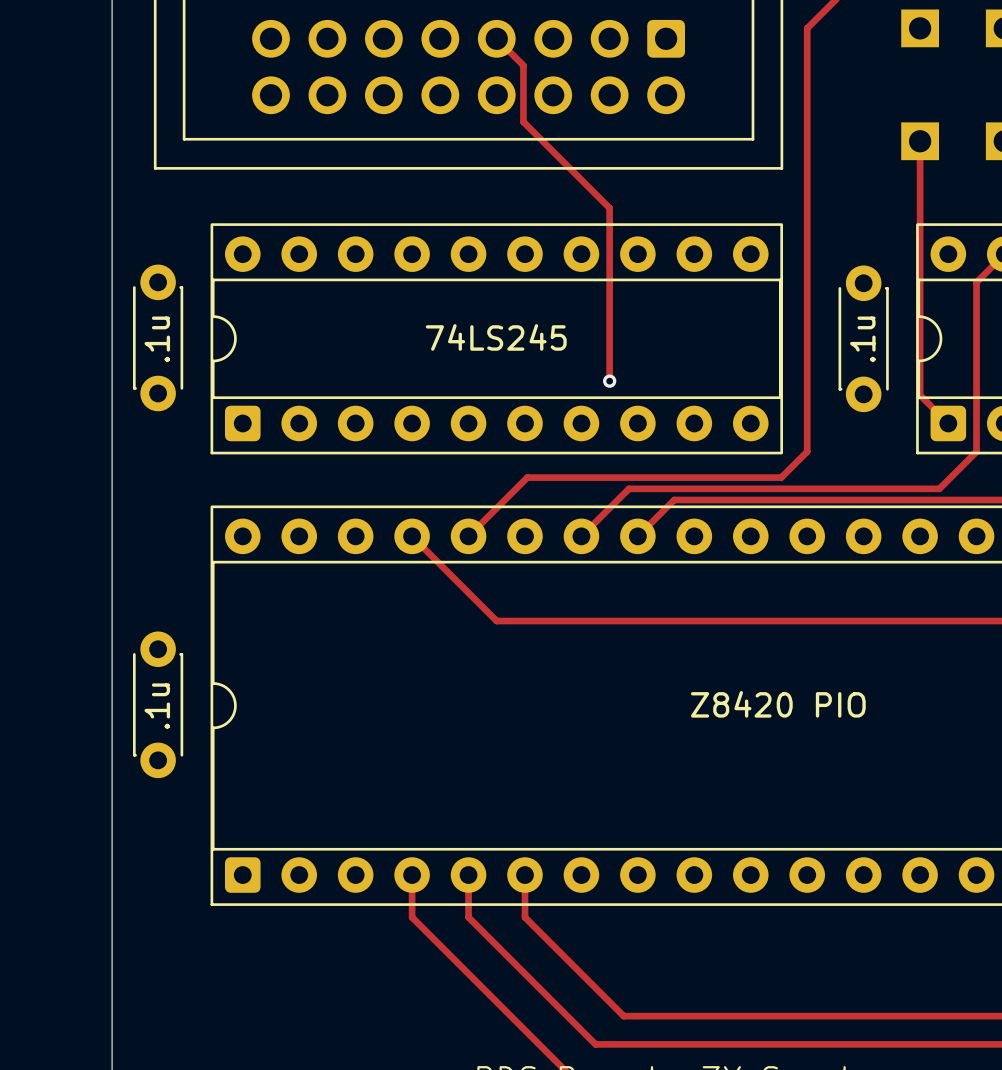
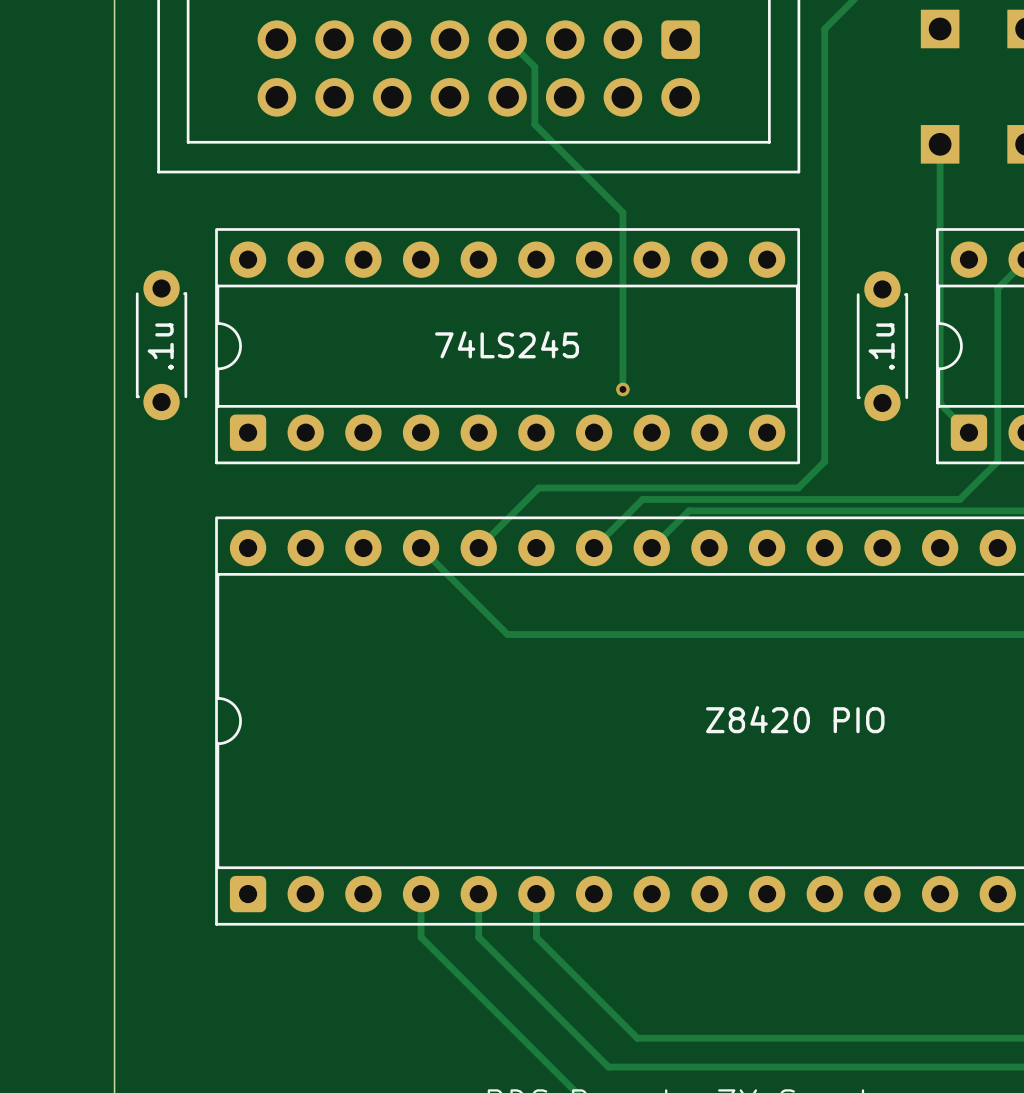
part: .1u (158, 704) -> none

